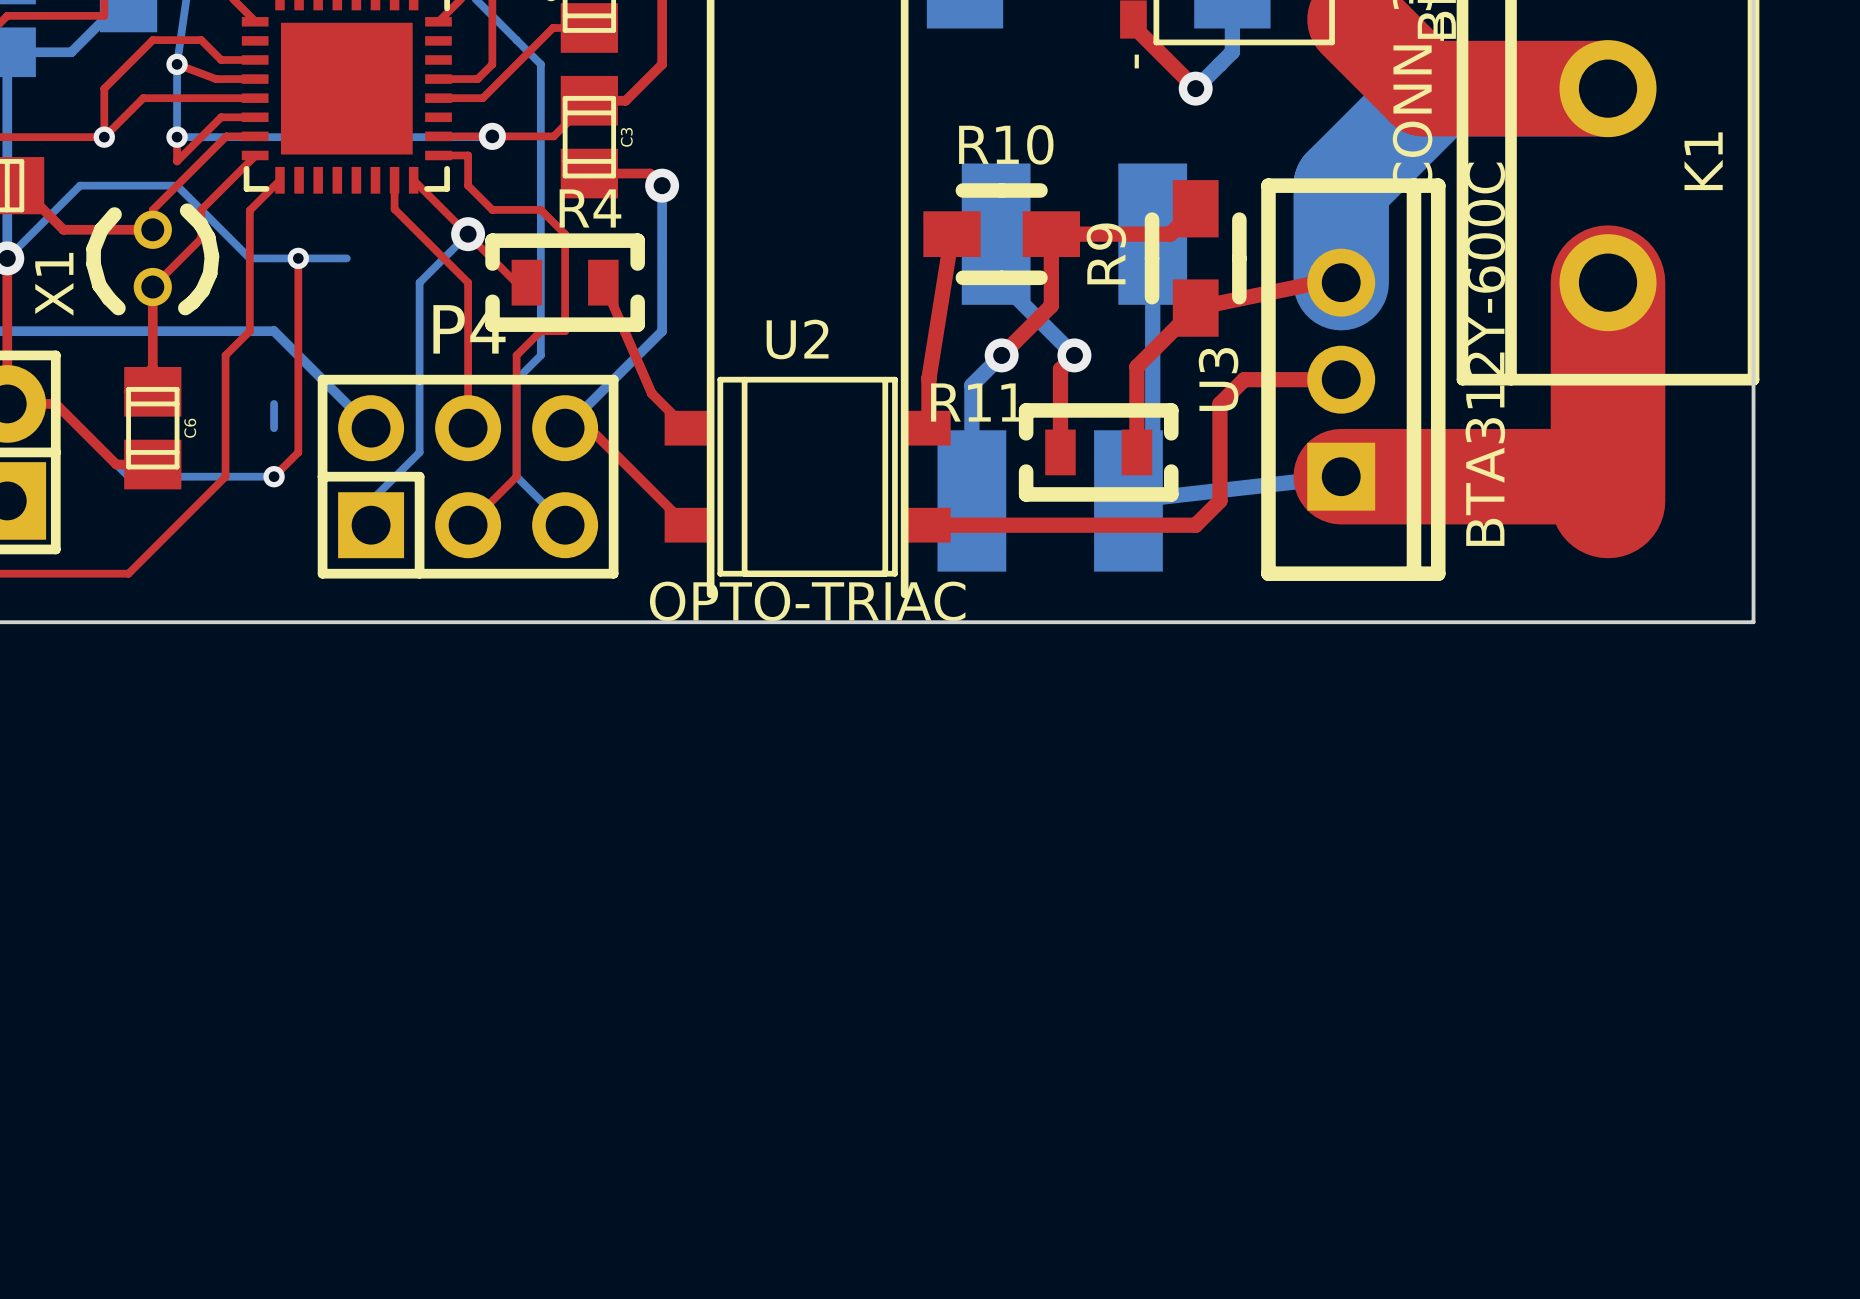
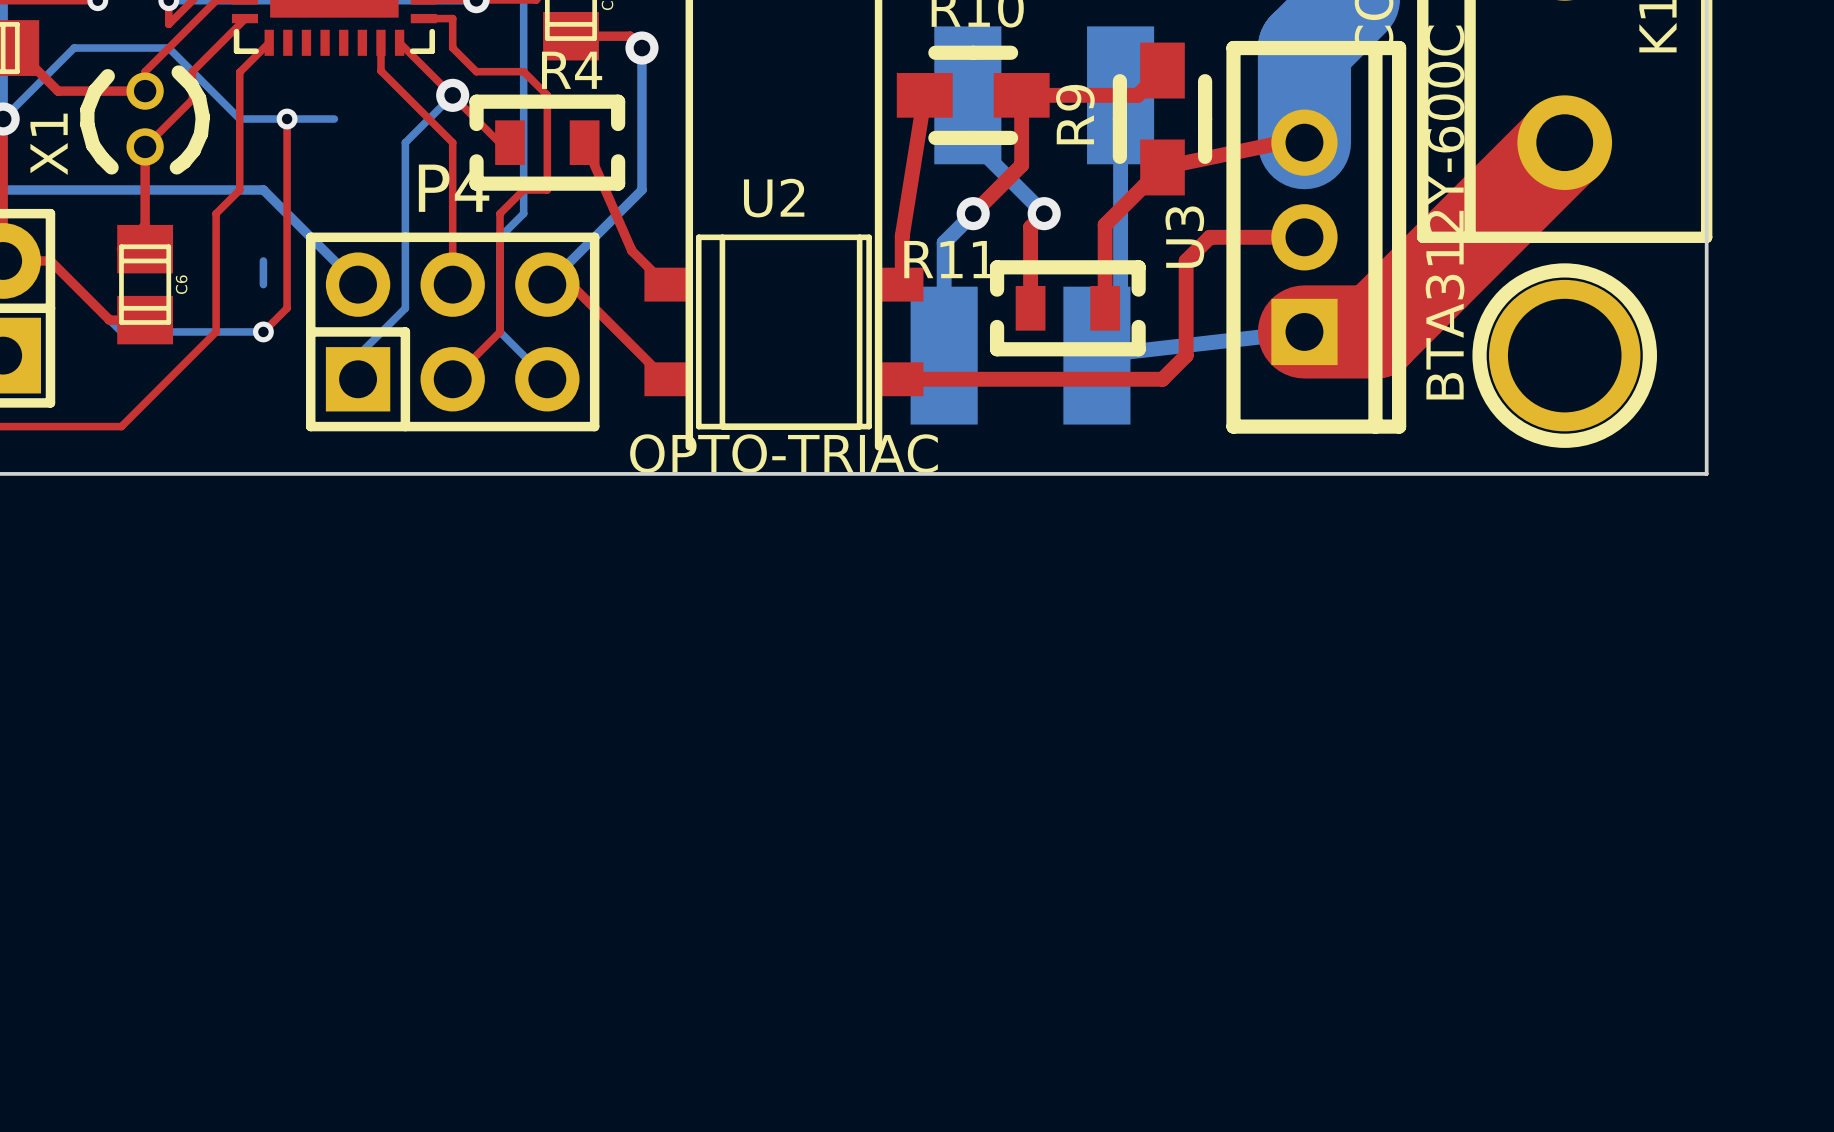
top track: (1608, 282) (1608, 500) (1608, 476) (1413, 476) -> (1564, 142) (1375, 331)
part: none -> (1564, 355)

